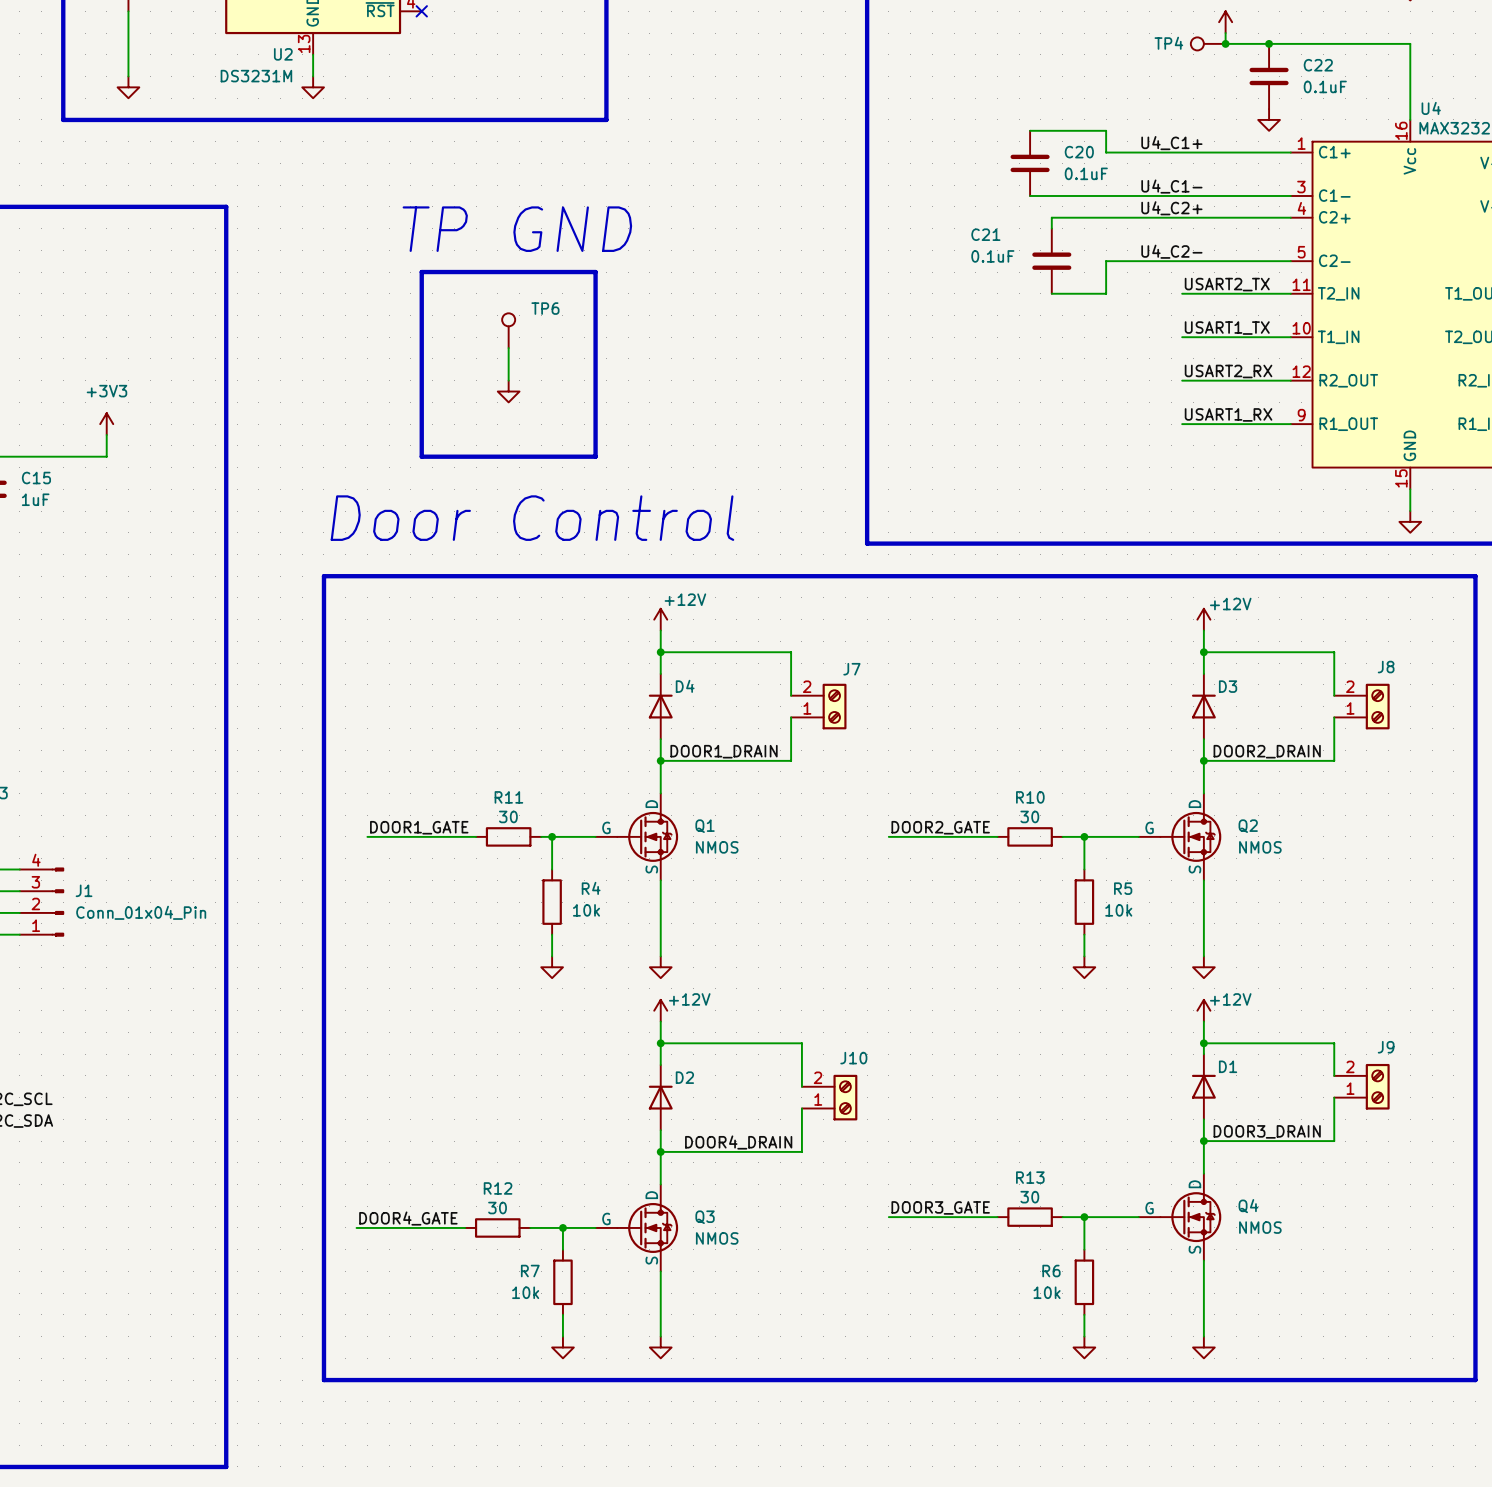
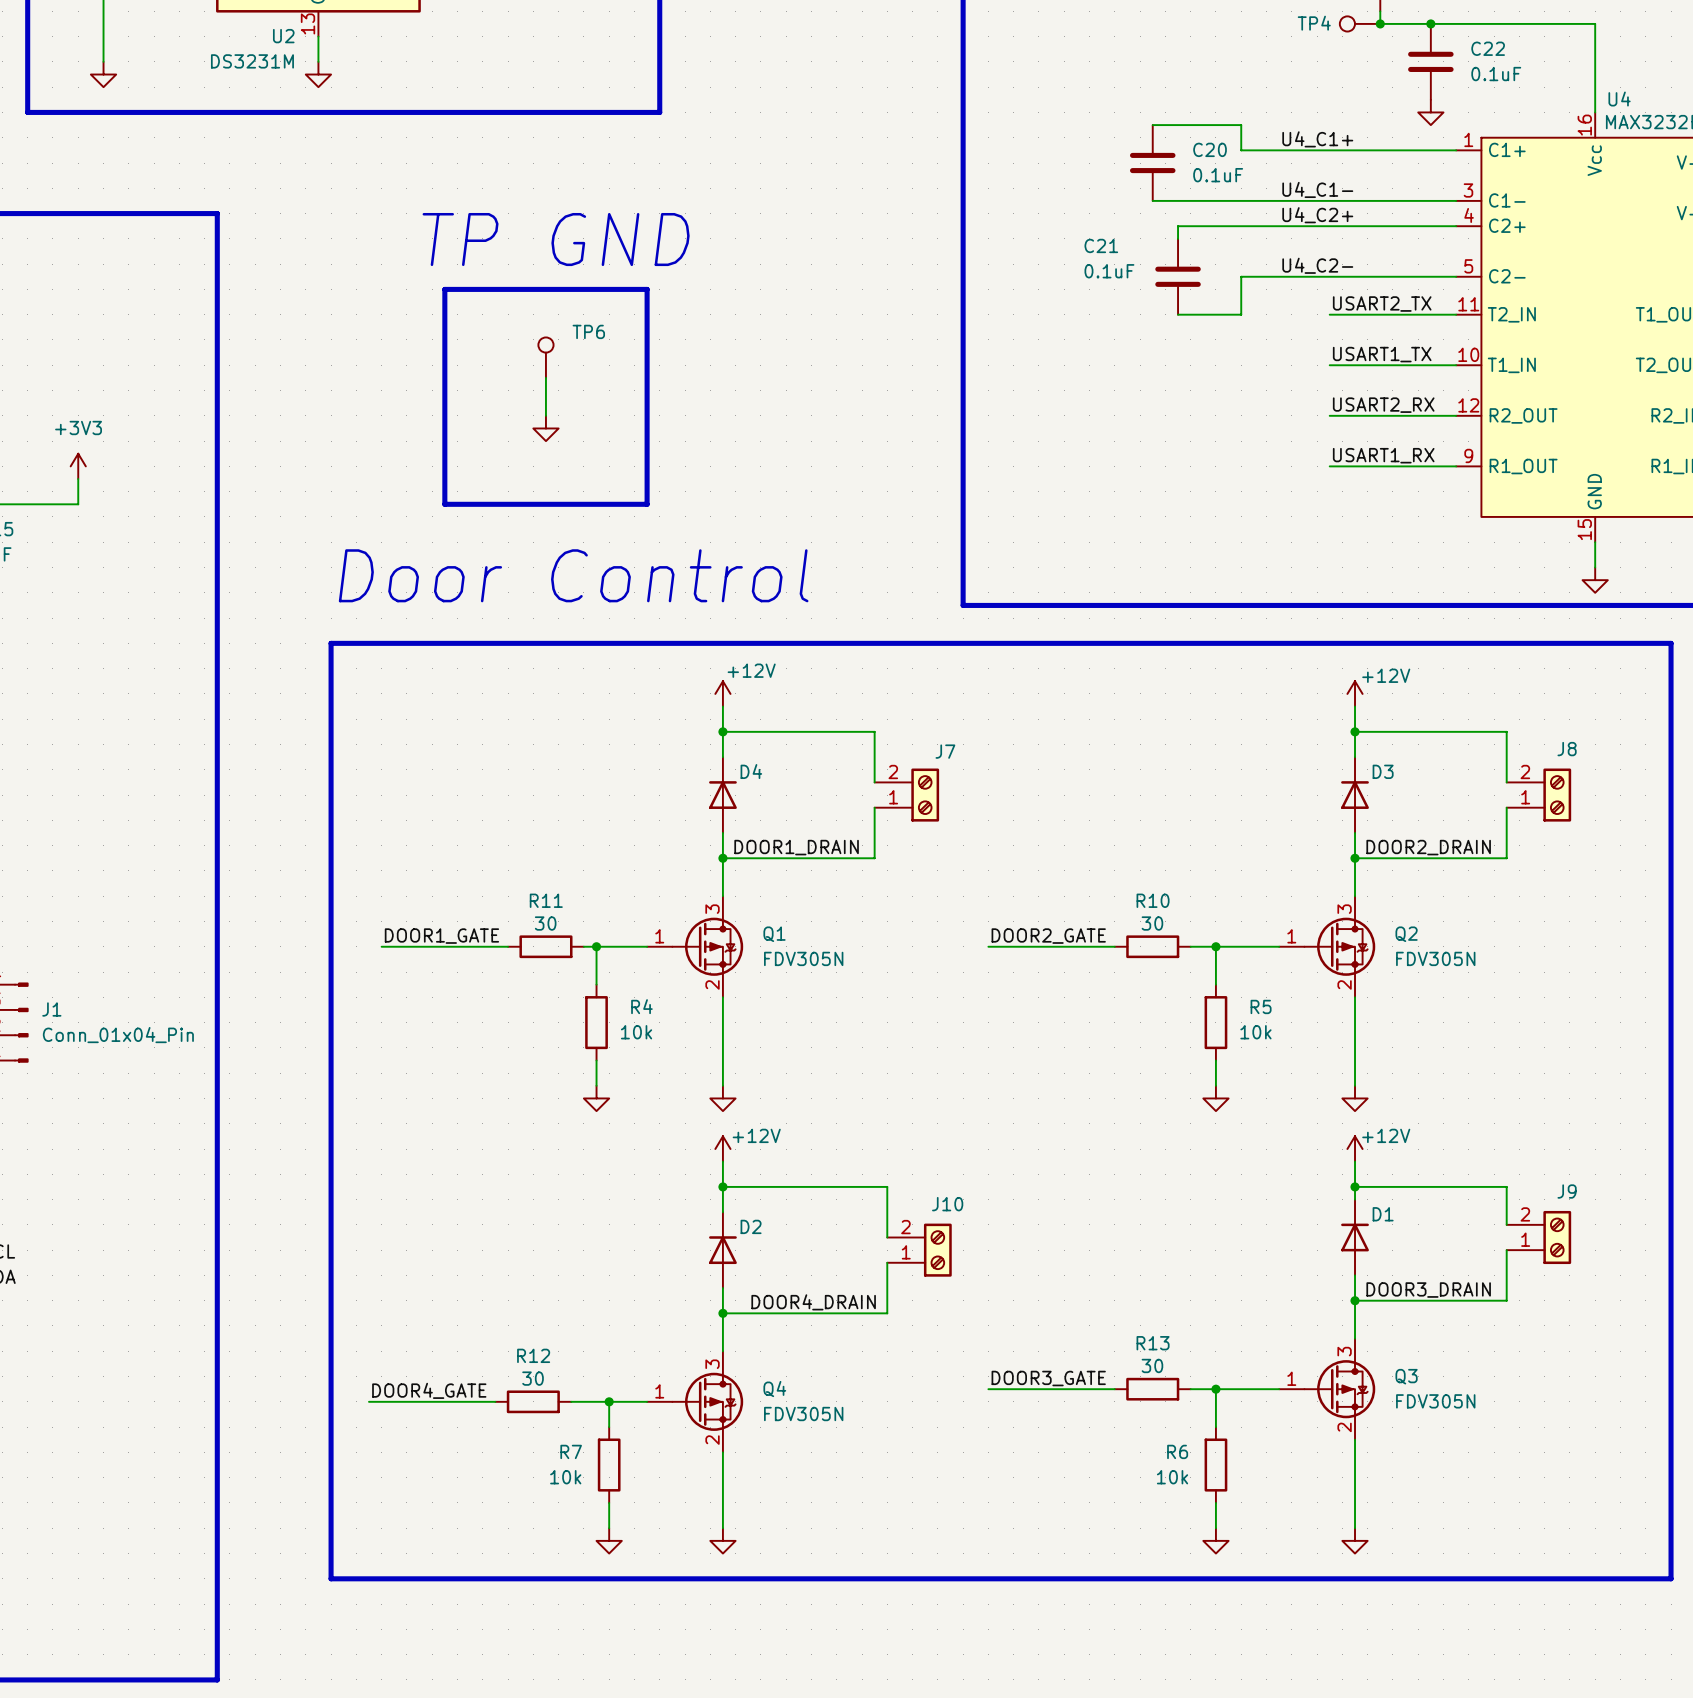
Q1 symbol: [595, 793, 679, 881] -> [647, 896, 744, 998]
Q2 symbol: [1138, 793, 1222, 881] -> [1279, 896, 1376, 998]
Q1 value: NMOS (717, 847) -> FDV305N (803, 958)
Q2 value: NMOS (1260, 847) -> FDV305N (1435, 958)
Q4 symbol: [1138, 1173, 1222, 1261] -> [647, 1351, 744, 1453]
Q3 symbol: [595, 1184, 679, 1272] -> [1279, 1338, 1376, 1440]
Q4 value: NMOS (1260, 1227) -> FDV305N (803, 1414)
Q3 value: NMOS (717, 1238) -> FDV305N (1435, 1401)

